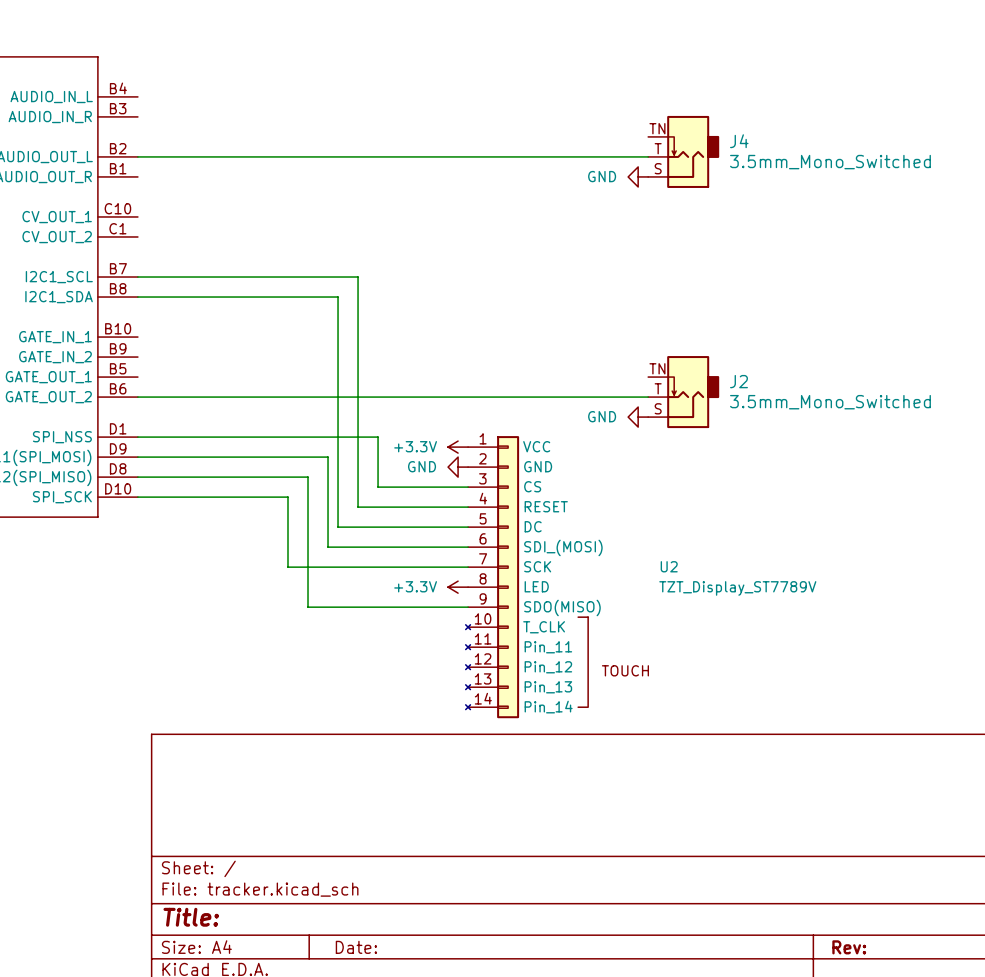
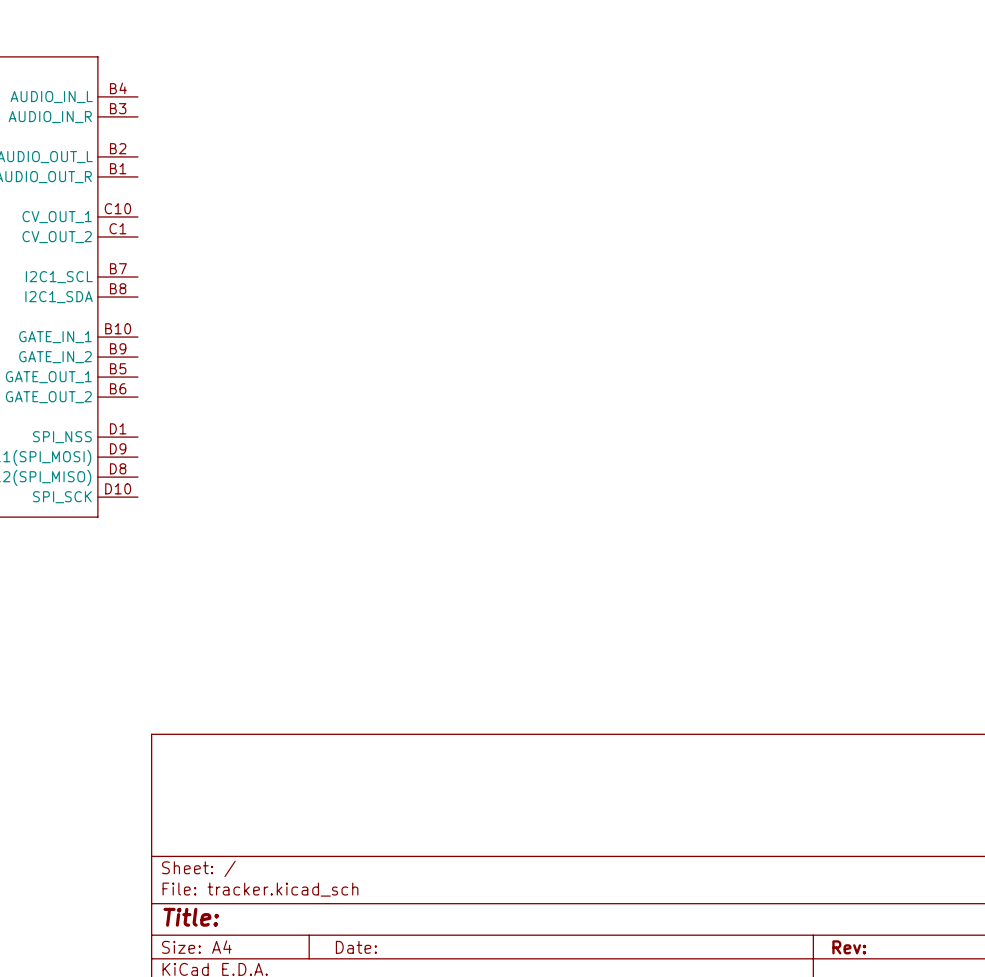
J4: 3.5mm_Mono_Switched (683, 151) -> none
wire: (137, 156) (648, 156) -> none
power symbol: GND (638, 176) -> none
wire: (137, 277) (358, 277) (358, 507) (468, 507) -> none
wire: (137, 297) (338, 297) (338, 527) (468, 527) -> none
J2: 3.5mm_Mono_Switched (683, 392) -> none
wire: (137, 397) (648, 397) -> none
power symbol: GND (638, 417) -> none
wire: (137, 437) (378, 437) (378, 487) (468, 487) -> none
power symbol: +3.3V (458, 447) -> none
wire: (137, 457) (328, 457) (328, 547) (468, 547) -> none
power symbol: GND (458, 467) -> none
wire: (137, 477) (308, 477) (308, 607) (468, 607) -> none
wire: (137, 497) (287, 497) (287, 567) (468, 567) -> none
U2: TZT_Display_ST7789V (526, 577) -> none
power symbol: +3.3V (458, 587) -> none

